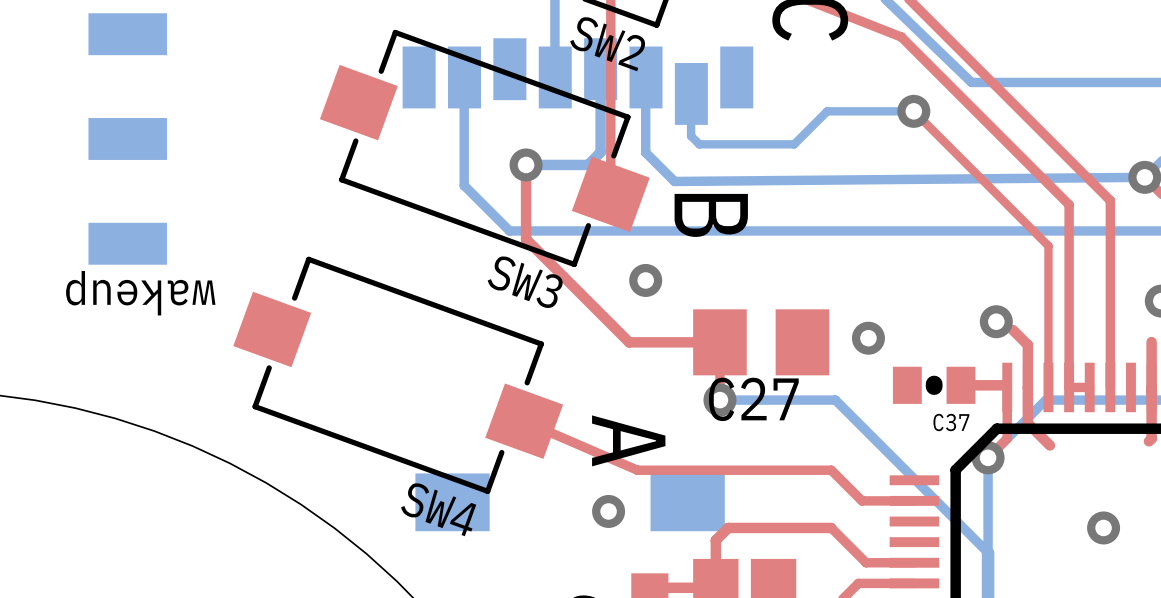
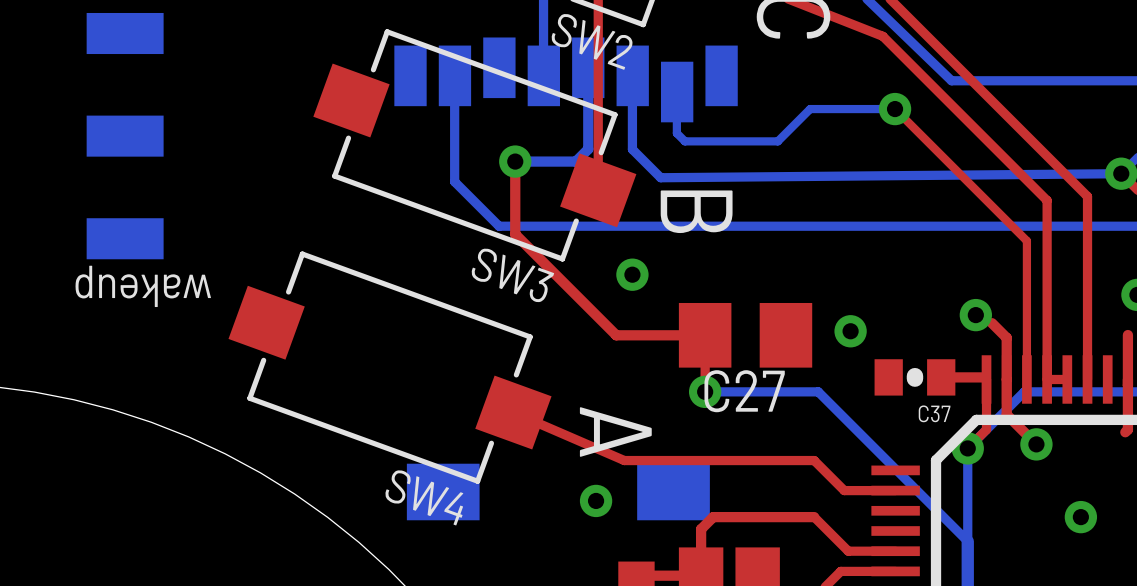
via: none -> (1036, 444)

